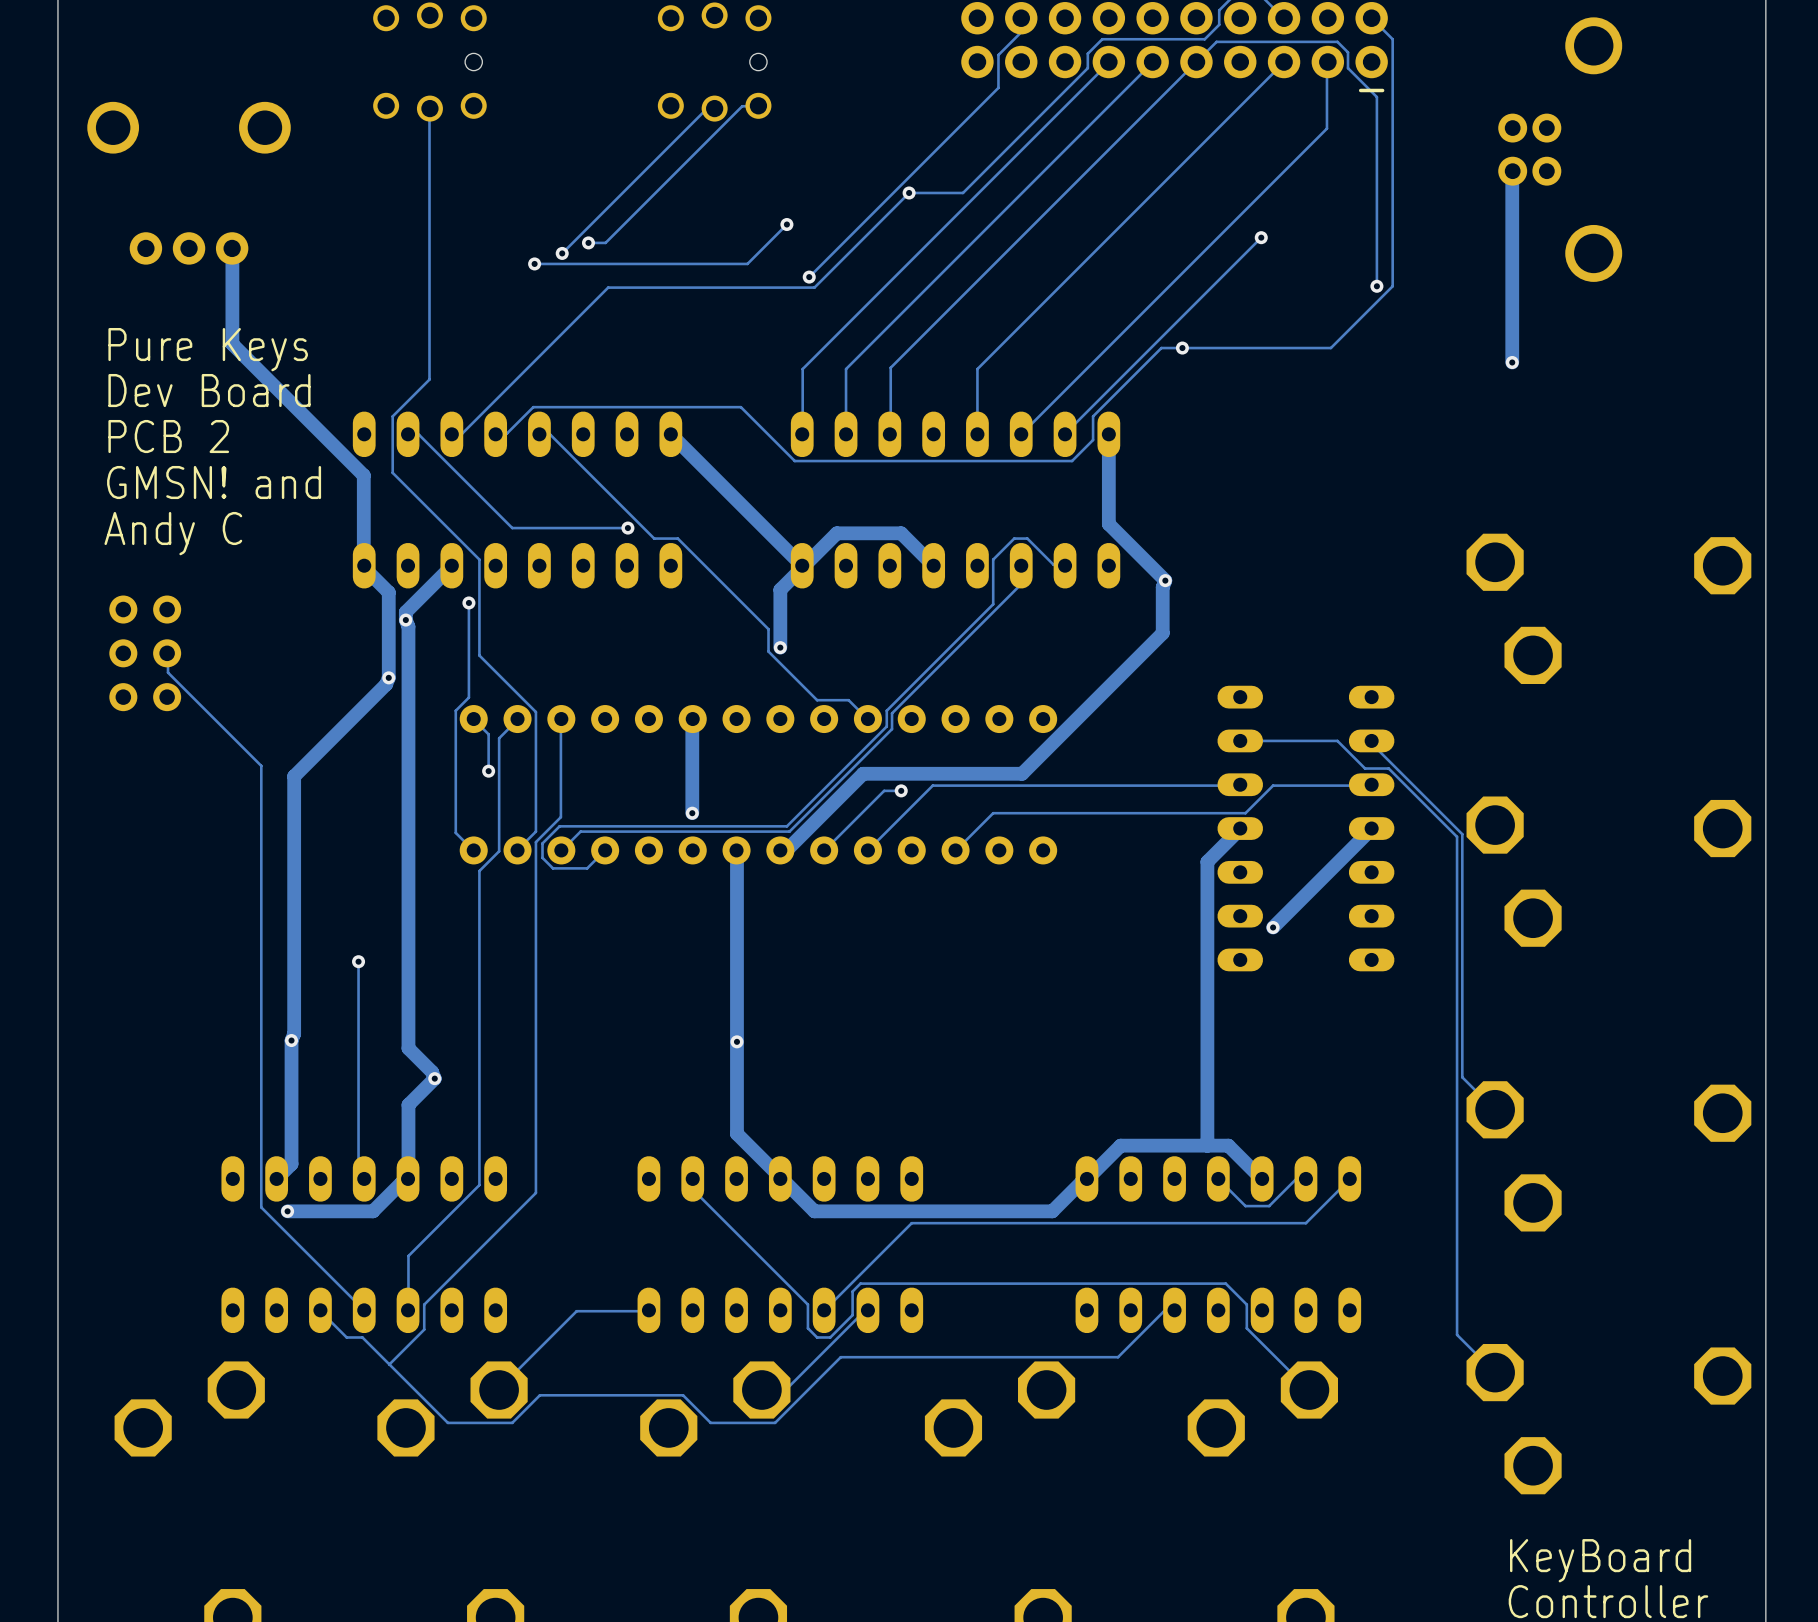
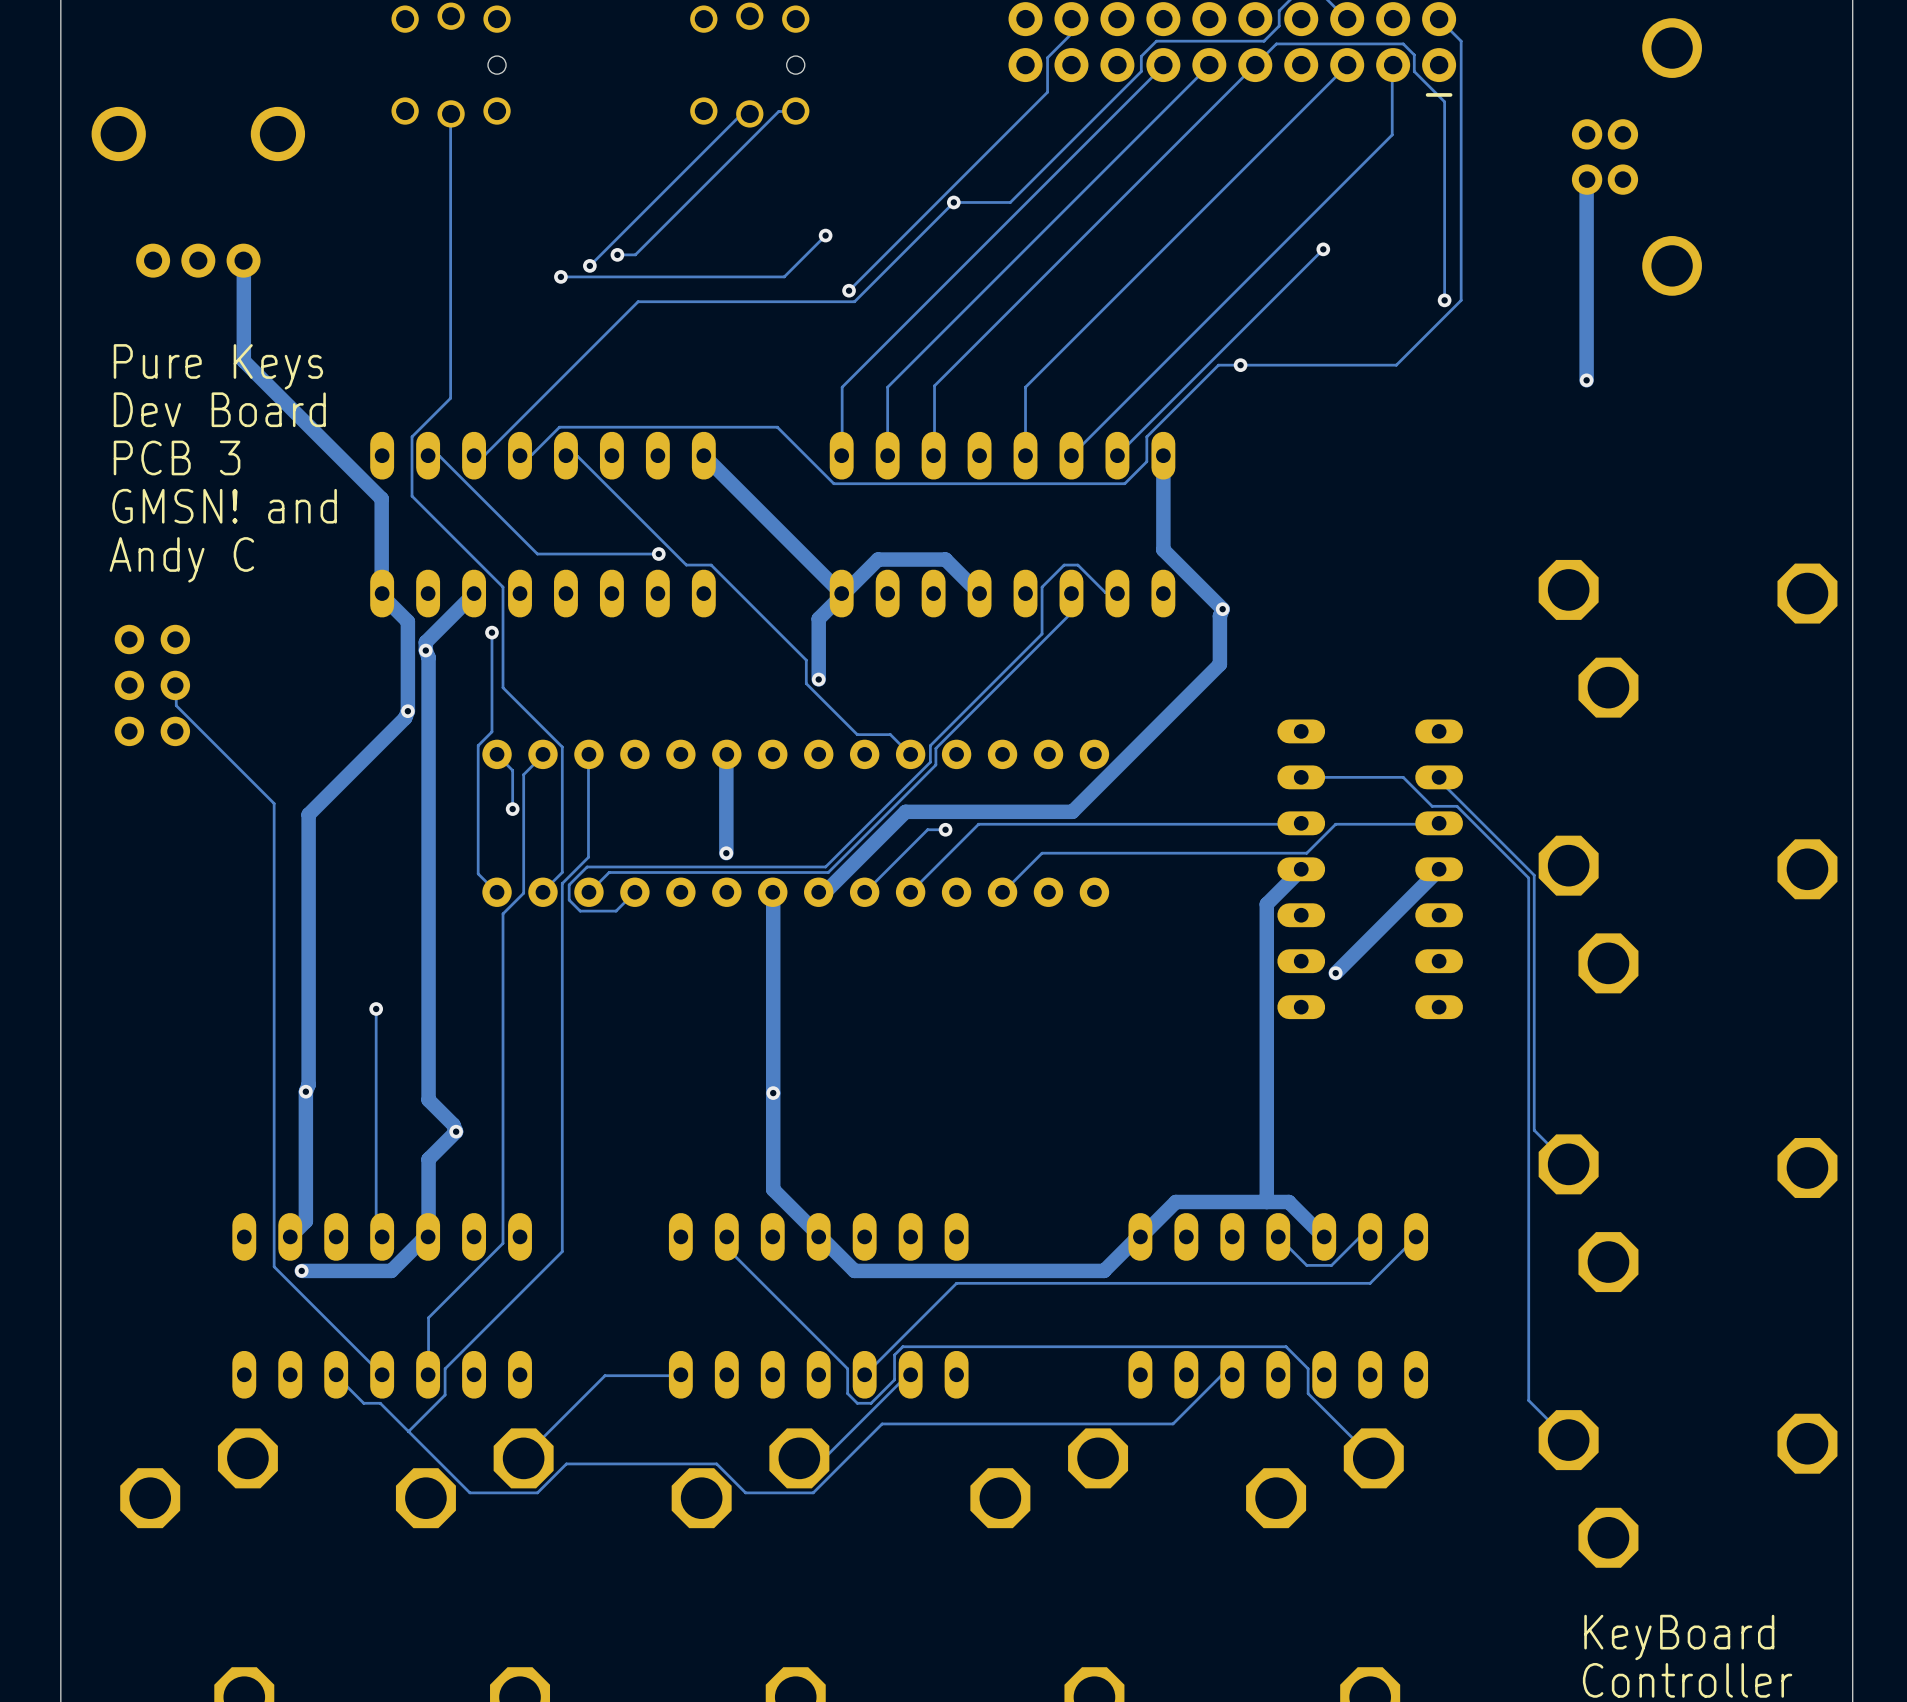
text: PCB 2 (168, 436) -> PCB 3 (177, 457)

